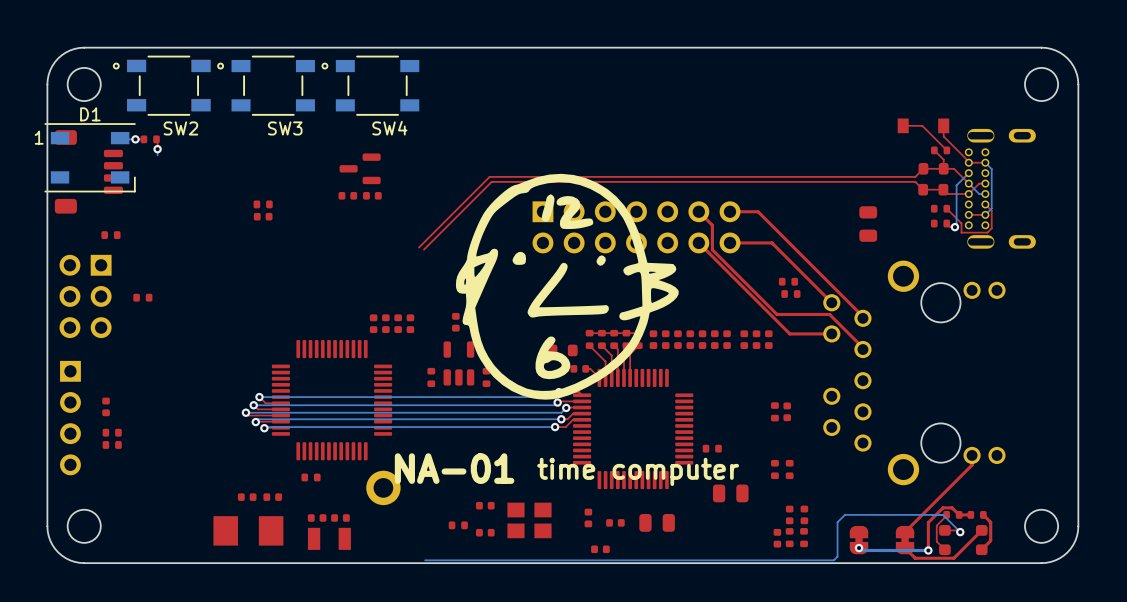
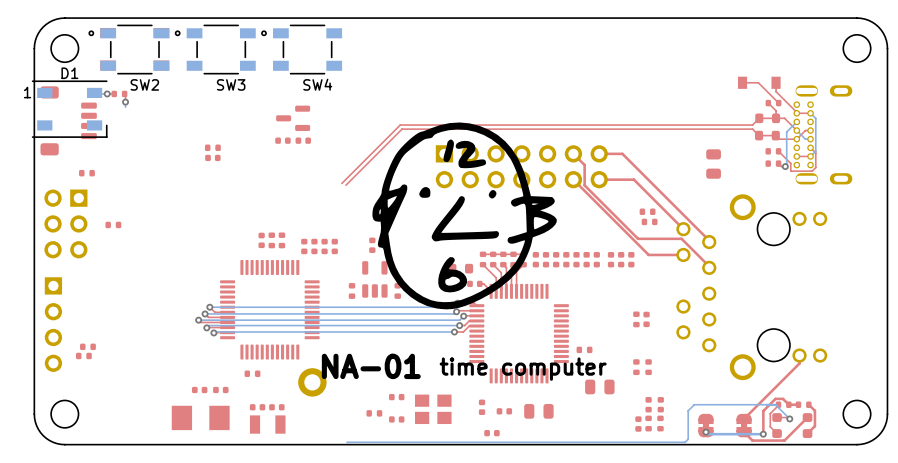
part: none -> (271, 240)
part: none -> (281, 240)
part position: (106, 406) -> (261, 240)
part position: (112, 432) -> (83, 355)

